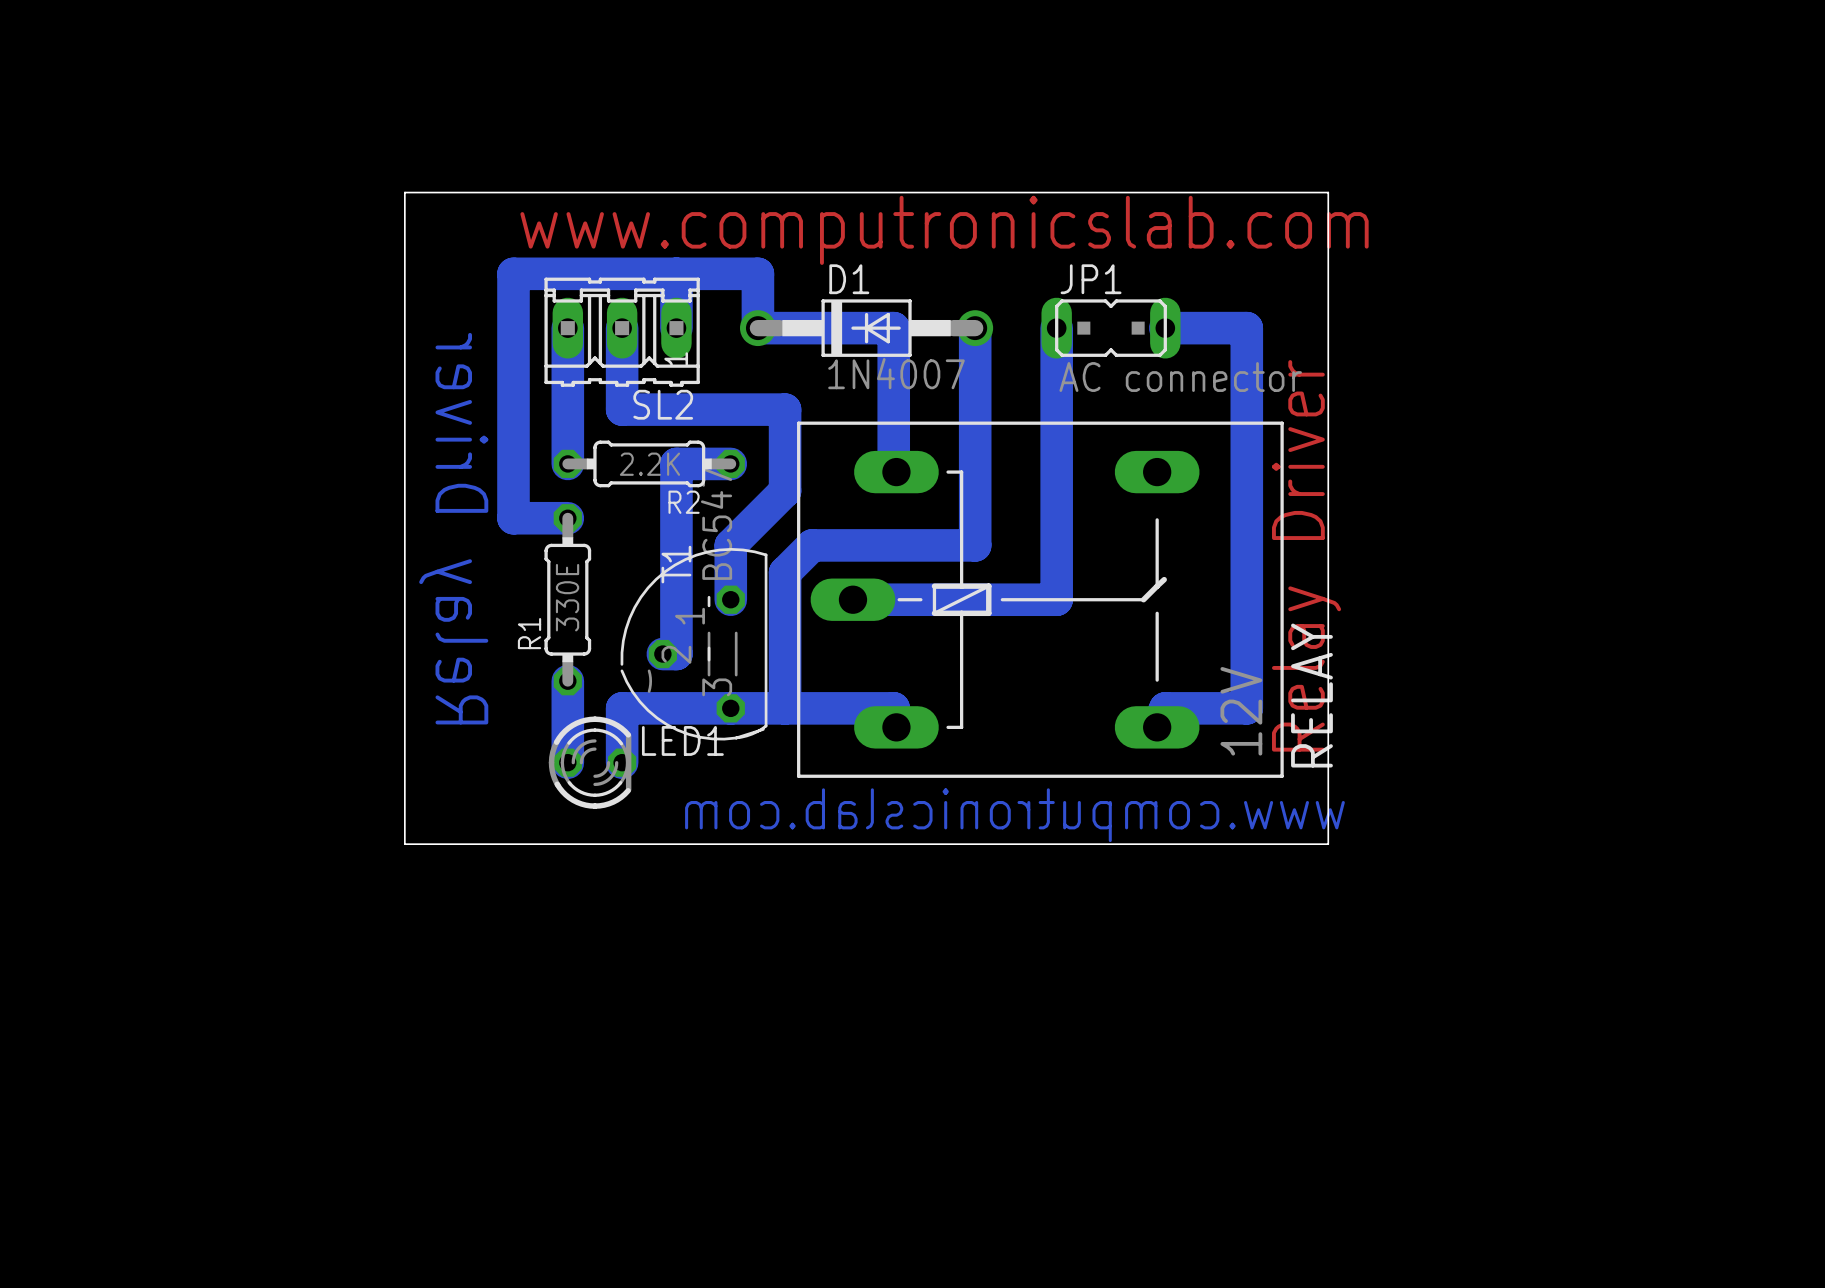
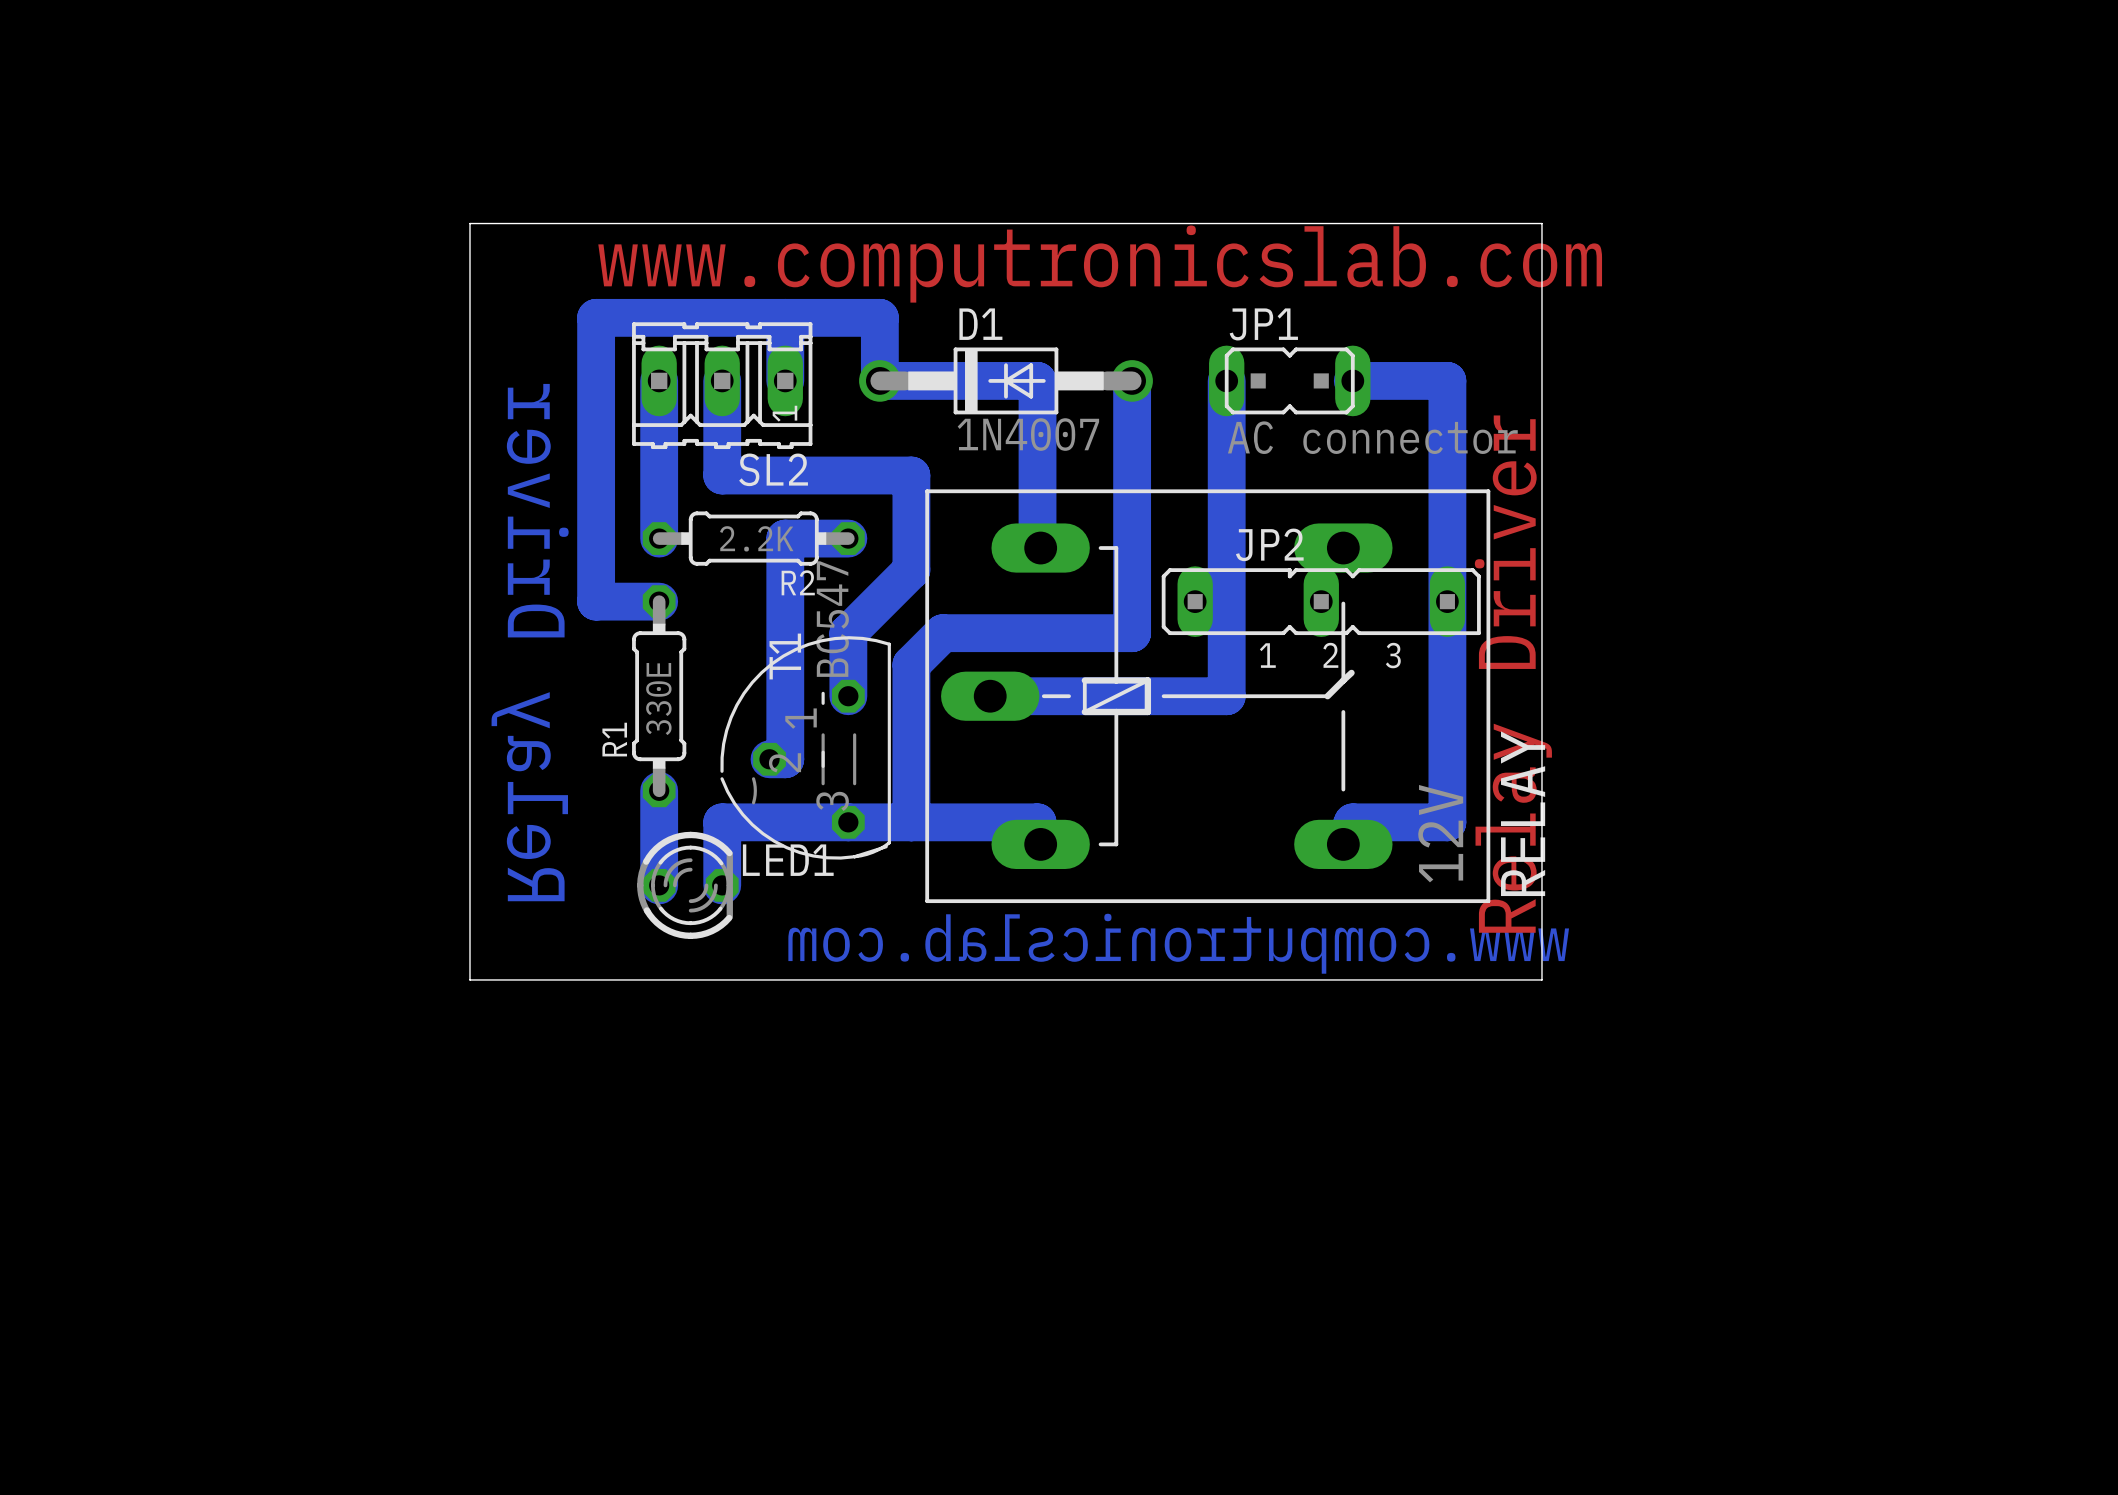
JP2: none -> (1321, 601)

